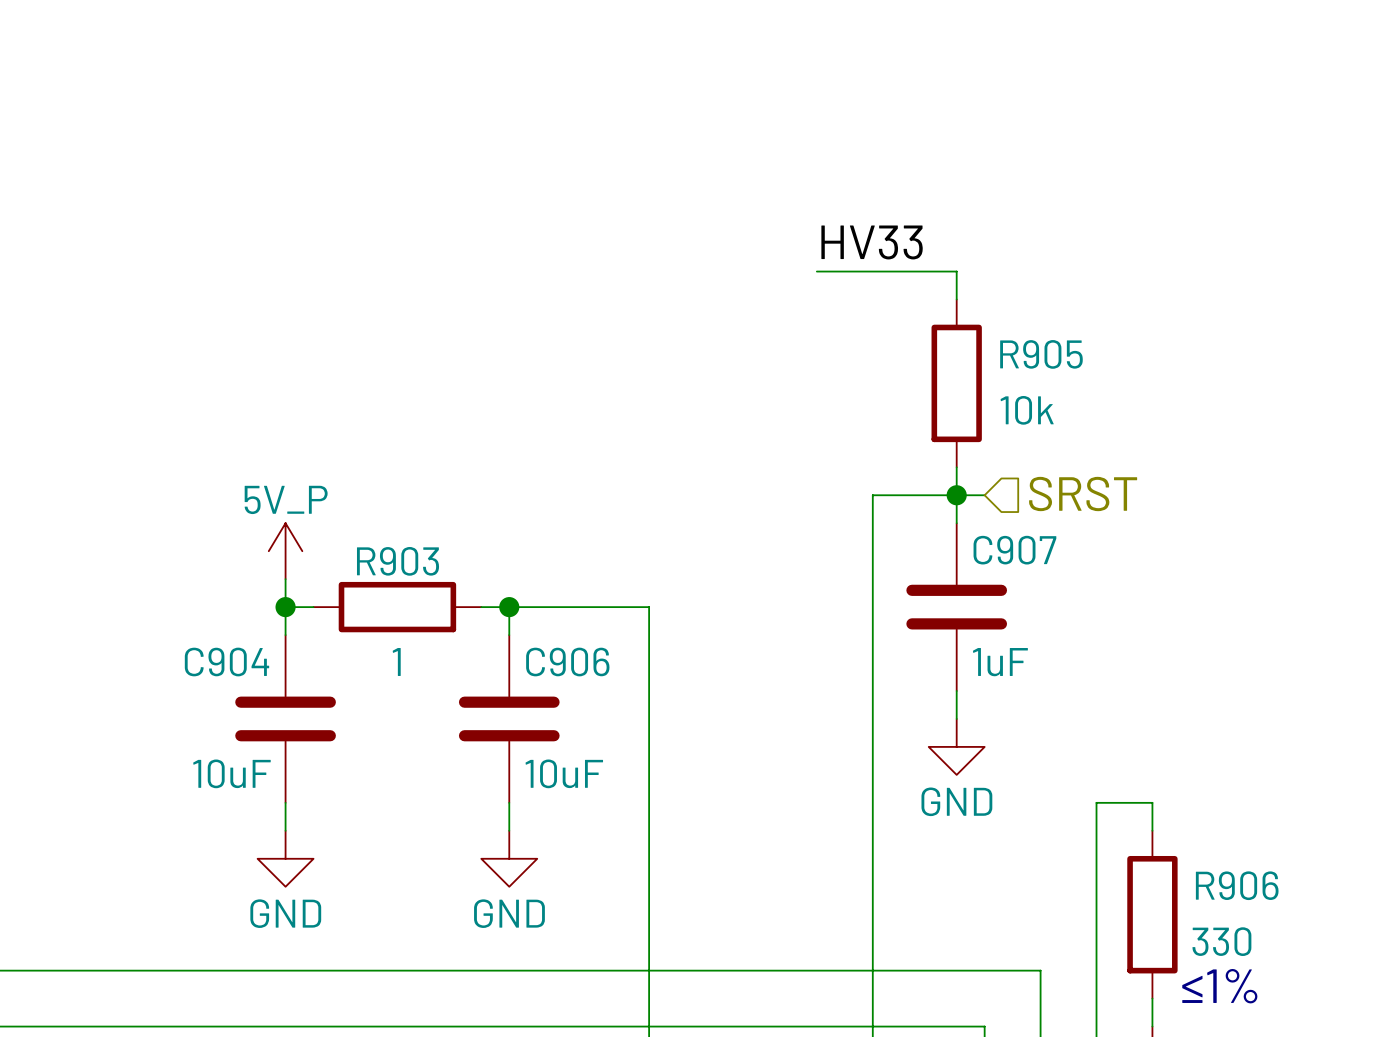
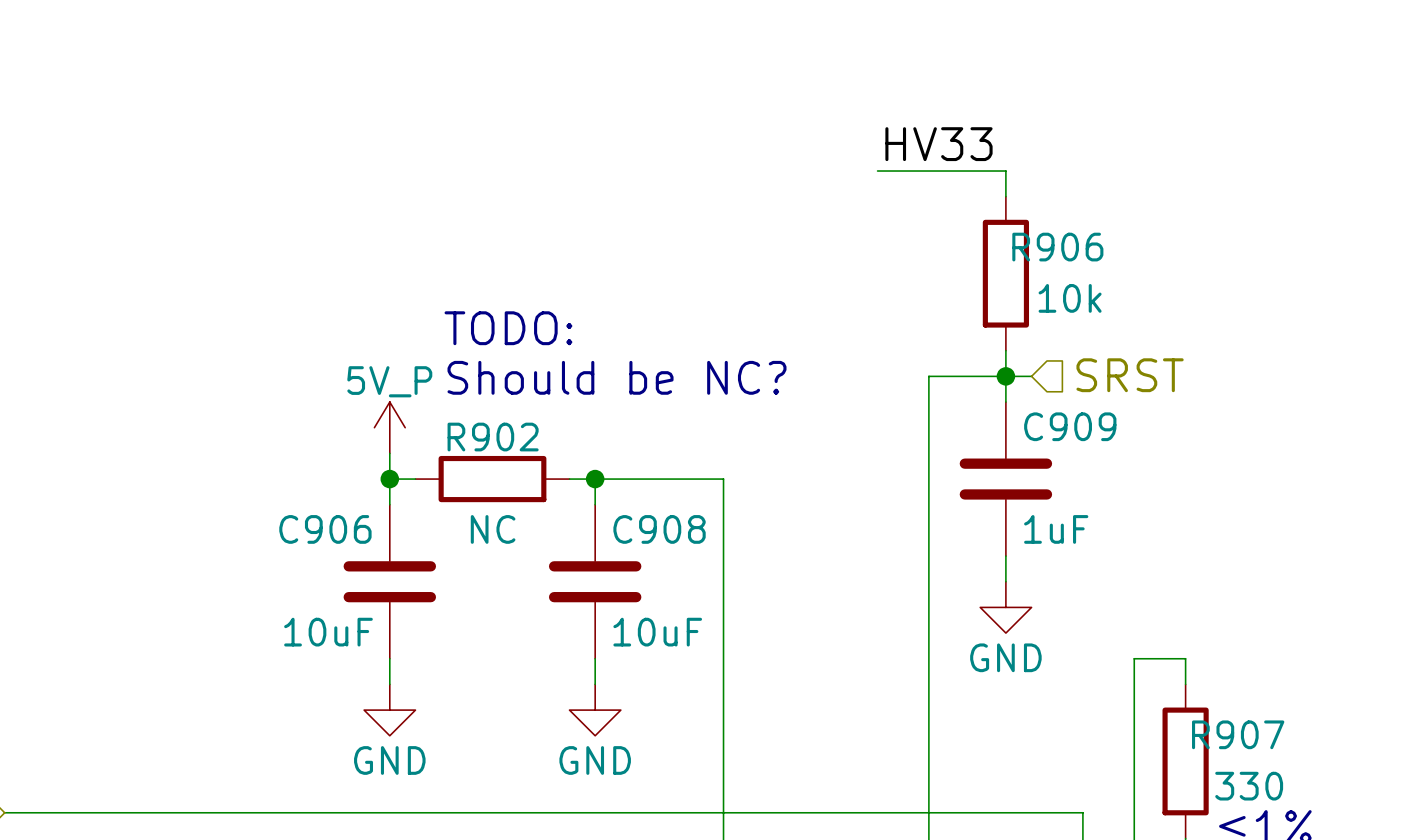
R905 name: R905 (1041, 354) -> R906 (1057, 247)
text: none -> TODO: (508, 328)
text: none -> Should be NC? (617, 377)
C907 name: C907 (1014, 550) -> C909 (1070, 426)
R903 name: R903 (398, 561) -> R902 (493, 437)
R903 value: 1 (396, 661) -> NC (493, 529)
C904 name: C904 (226, 662) -> C906 (325, 529)
C906 name: C906 (567, 662) -> C908 (659, 529)
R906 name: R906 (1237, 885) -> R907 (1238, 734)

